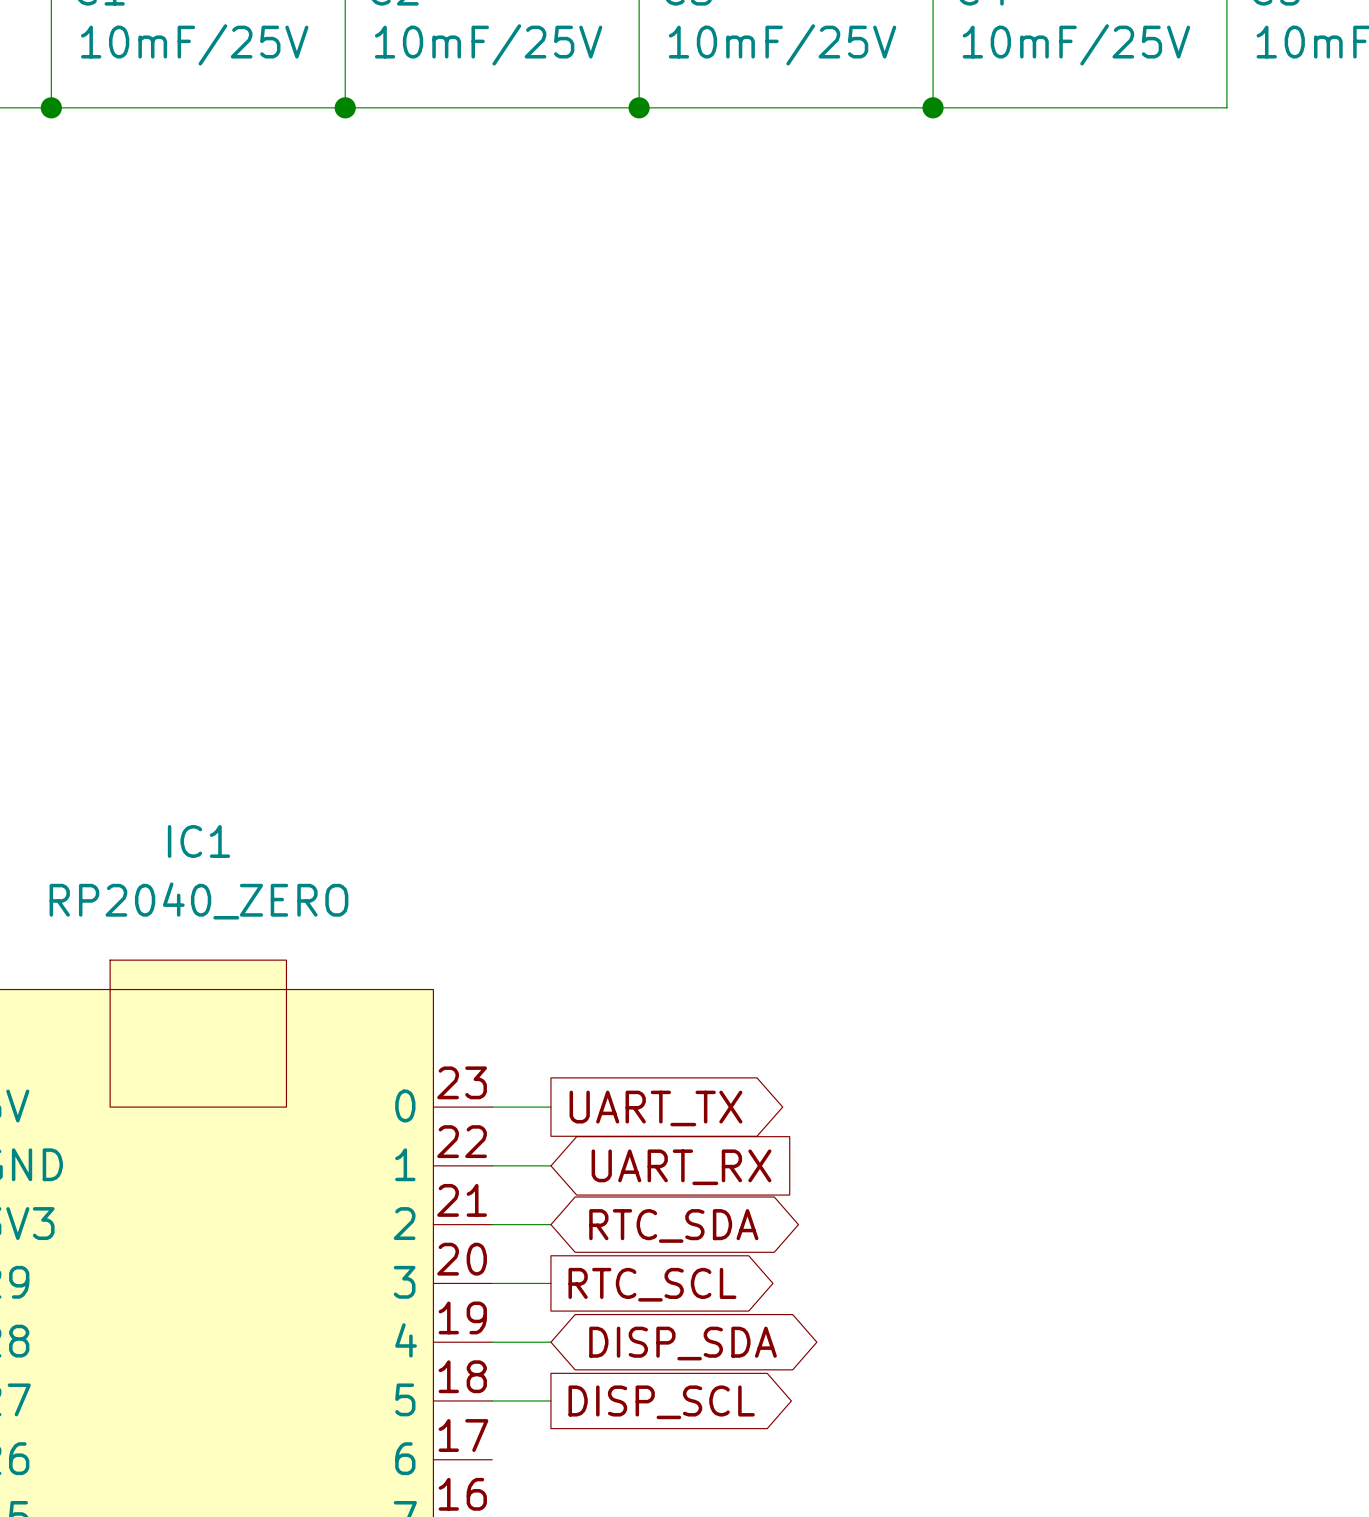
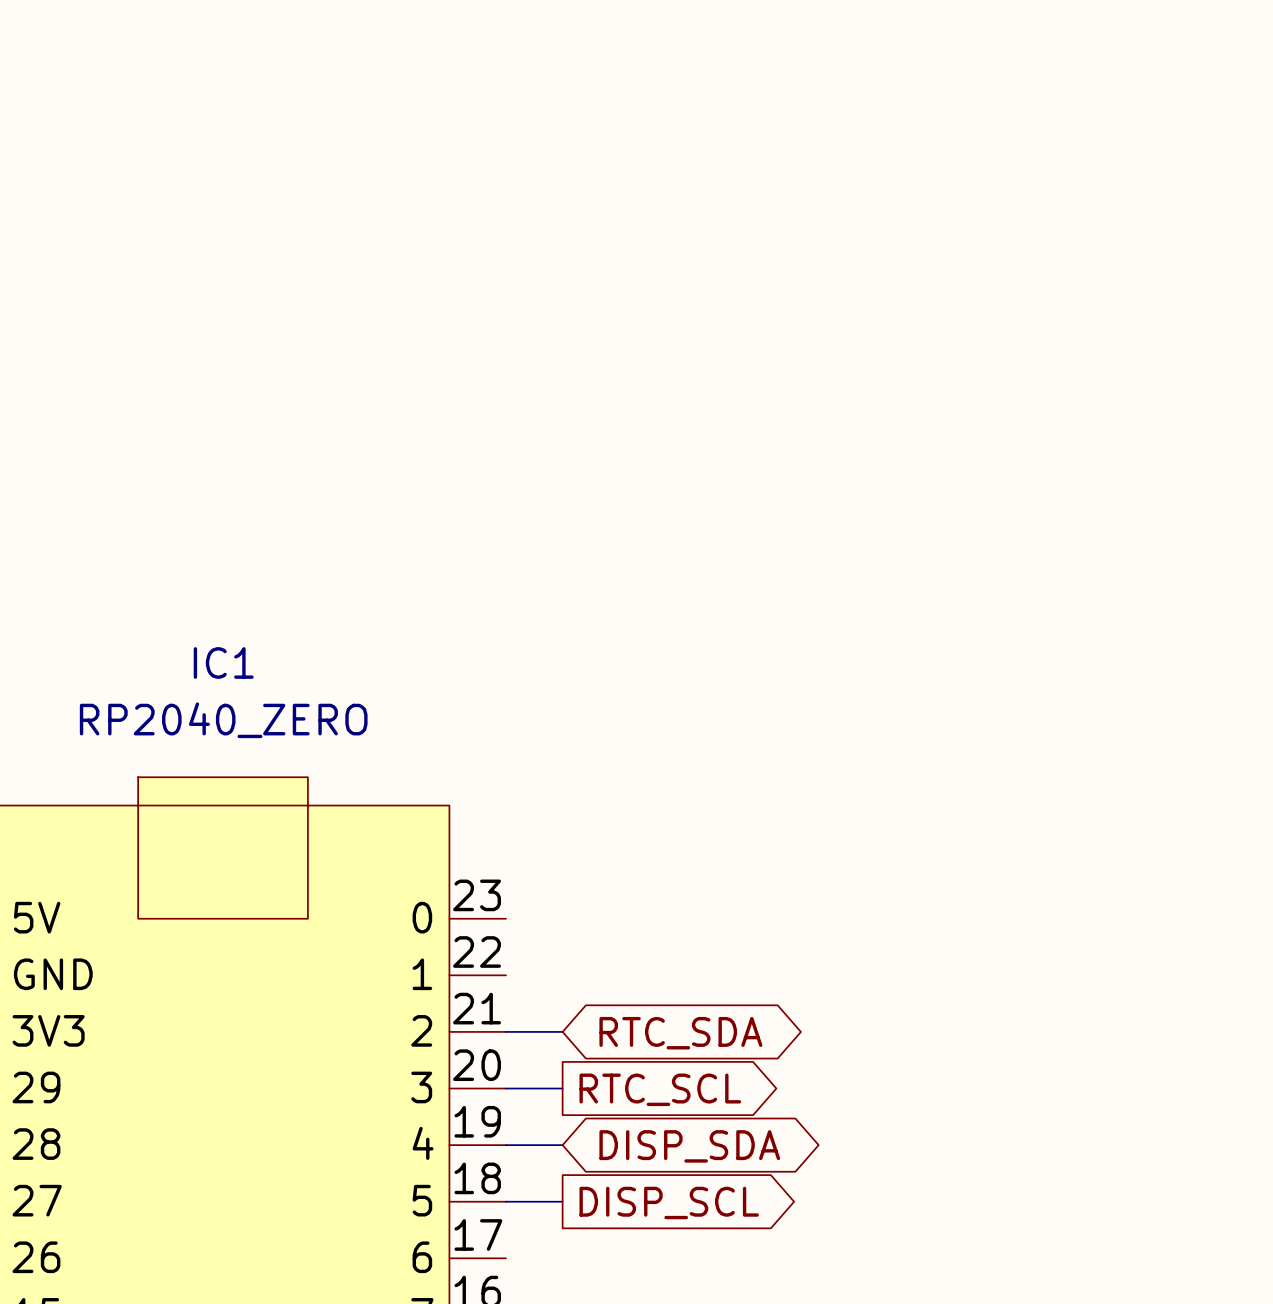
wire: (492, 1107) (550, 1107) -> none
global label: UART_TX (655, 1108) -> none
wire: (492, 1165) (550, 1165) -> none
global label: UART_RX (681, 1167) -> none

